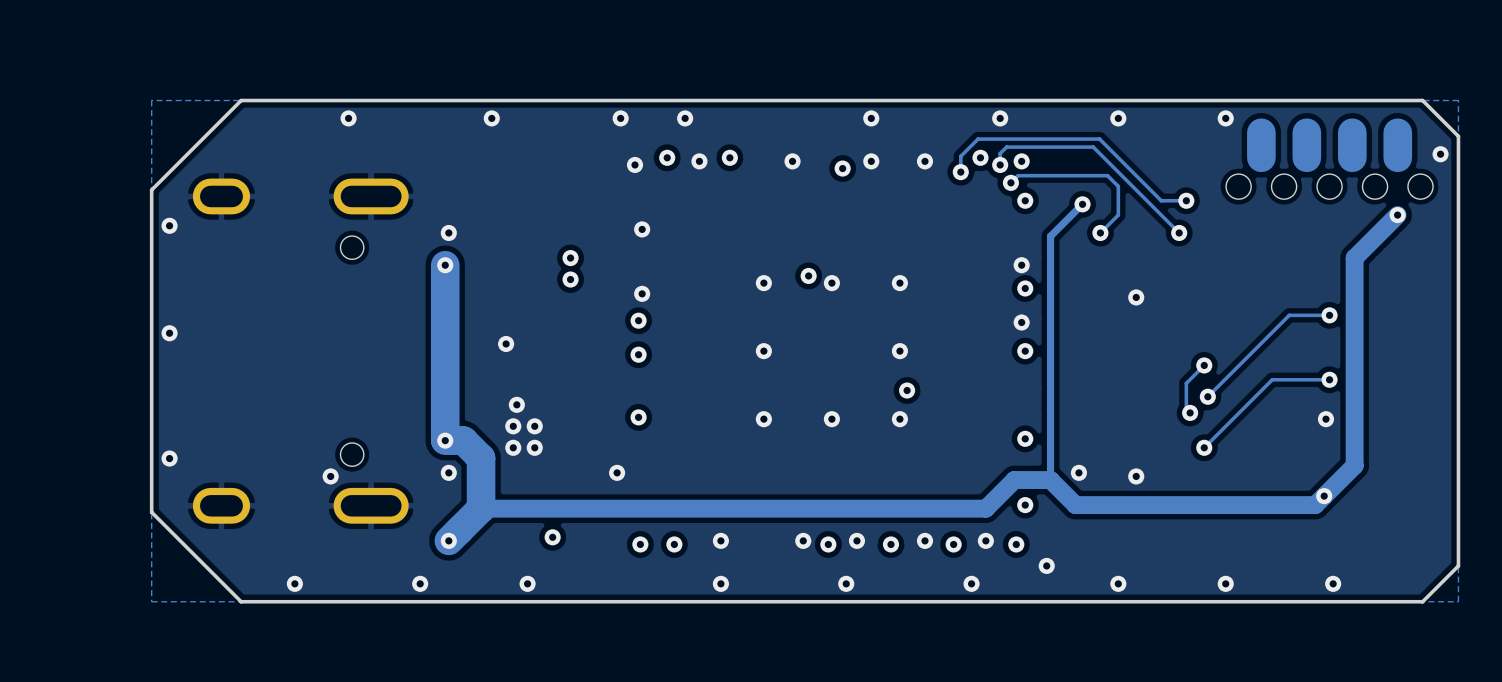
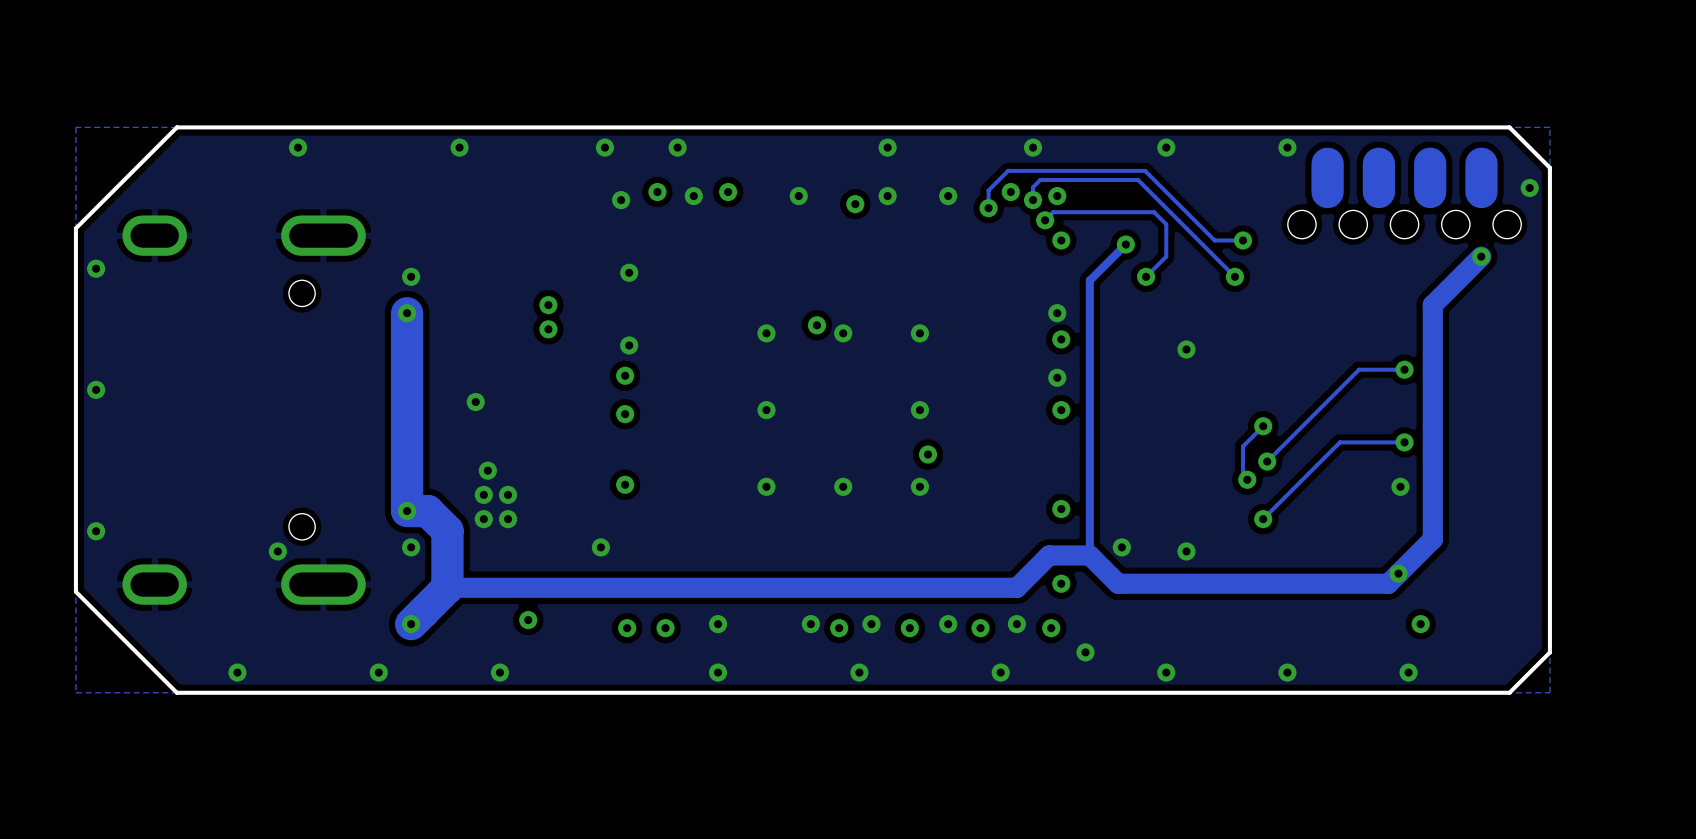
via: none -> (1420, 624)

